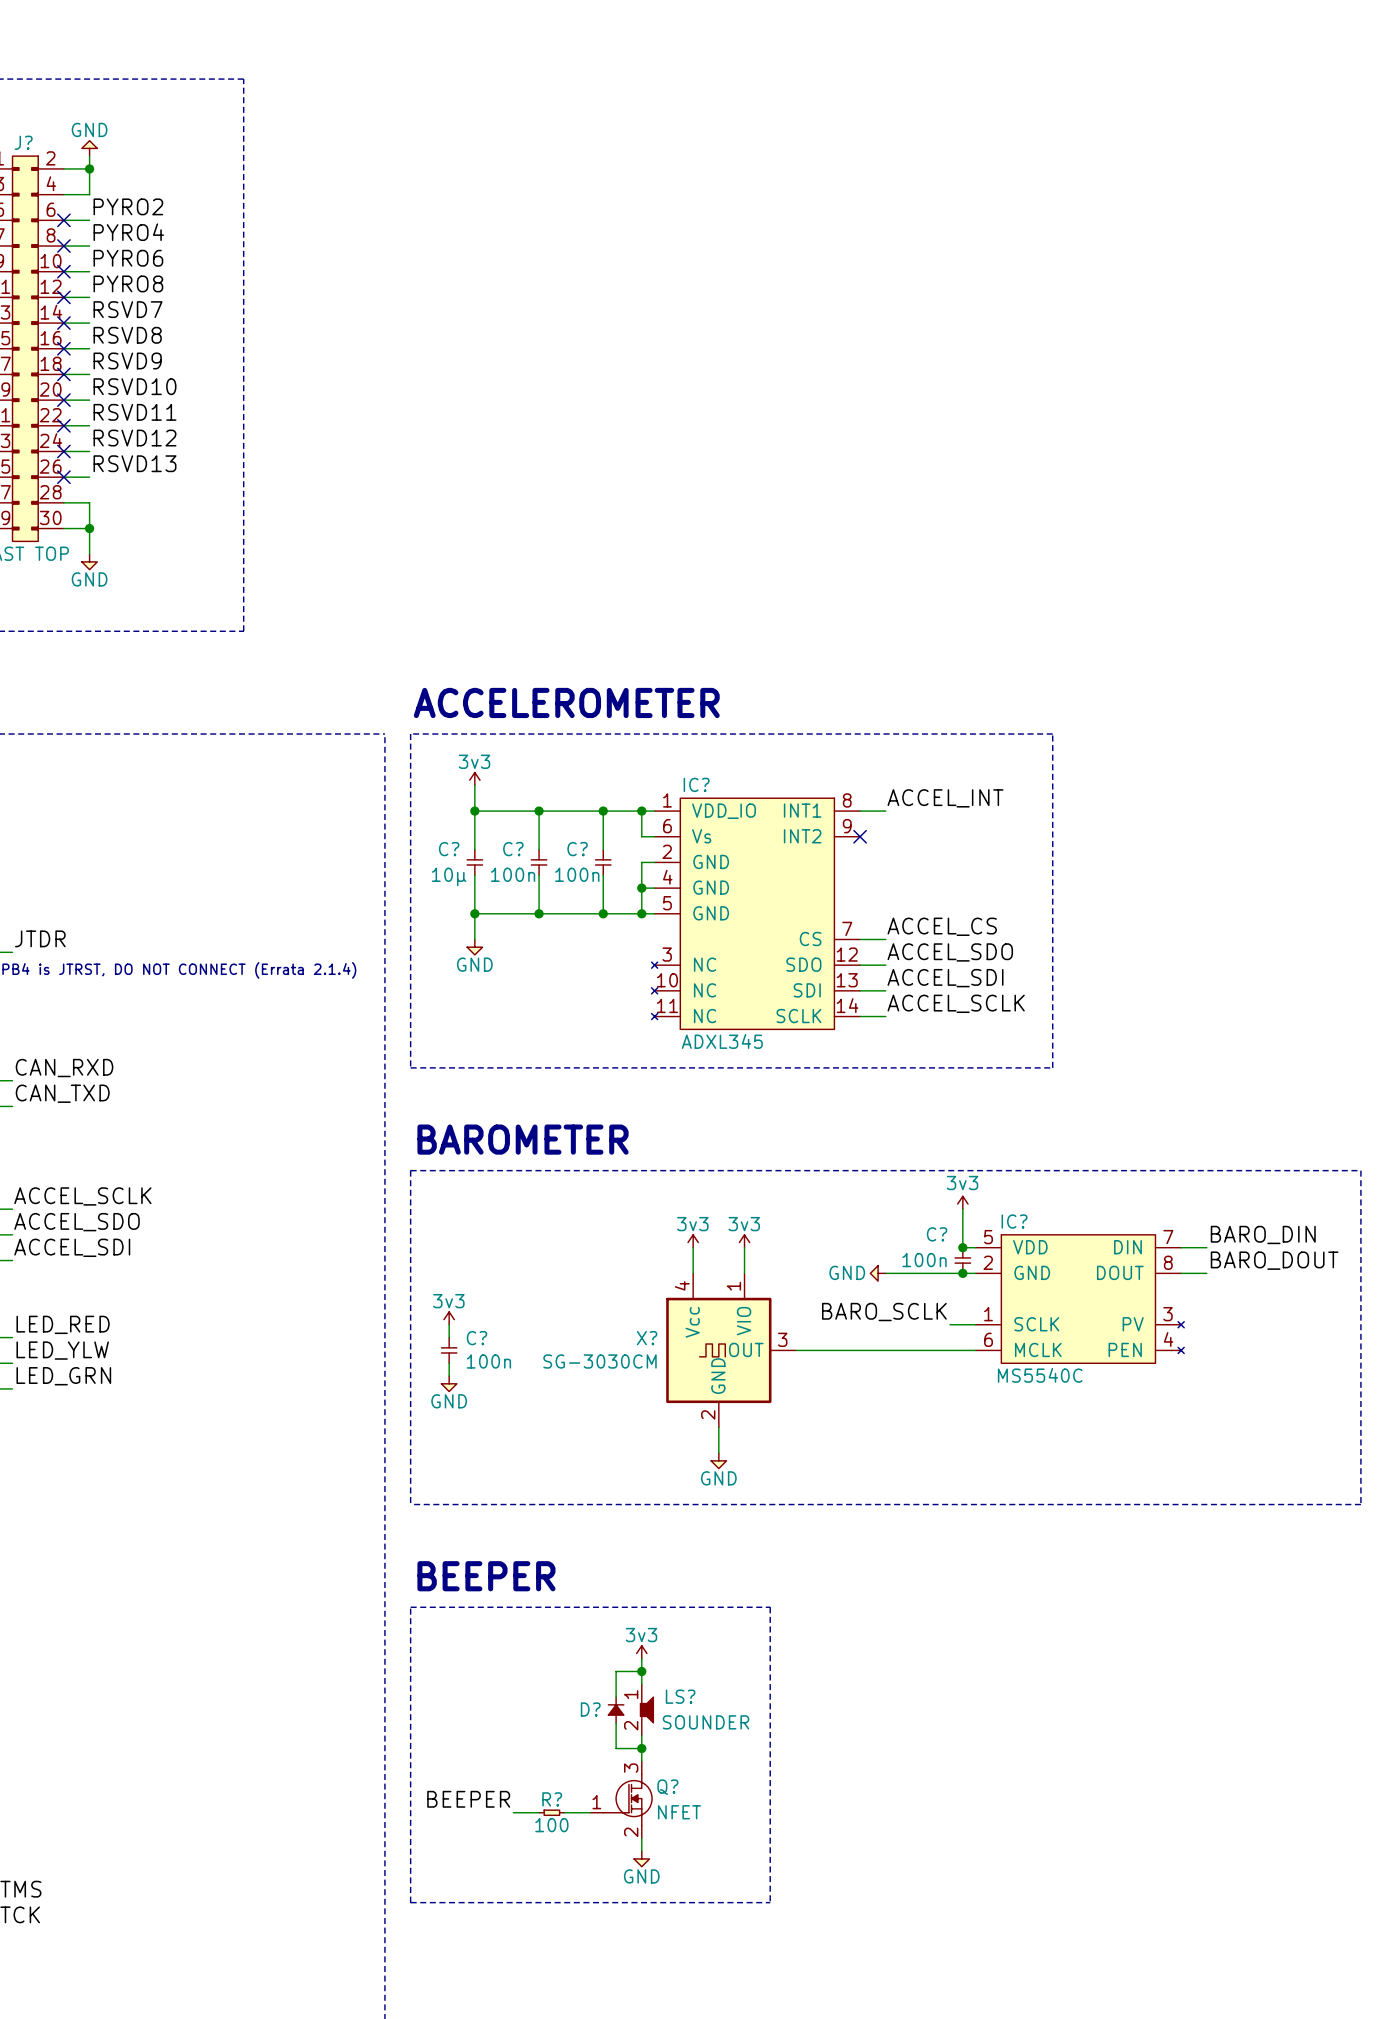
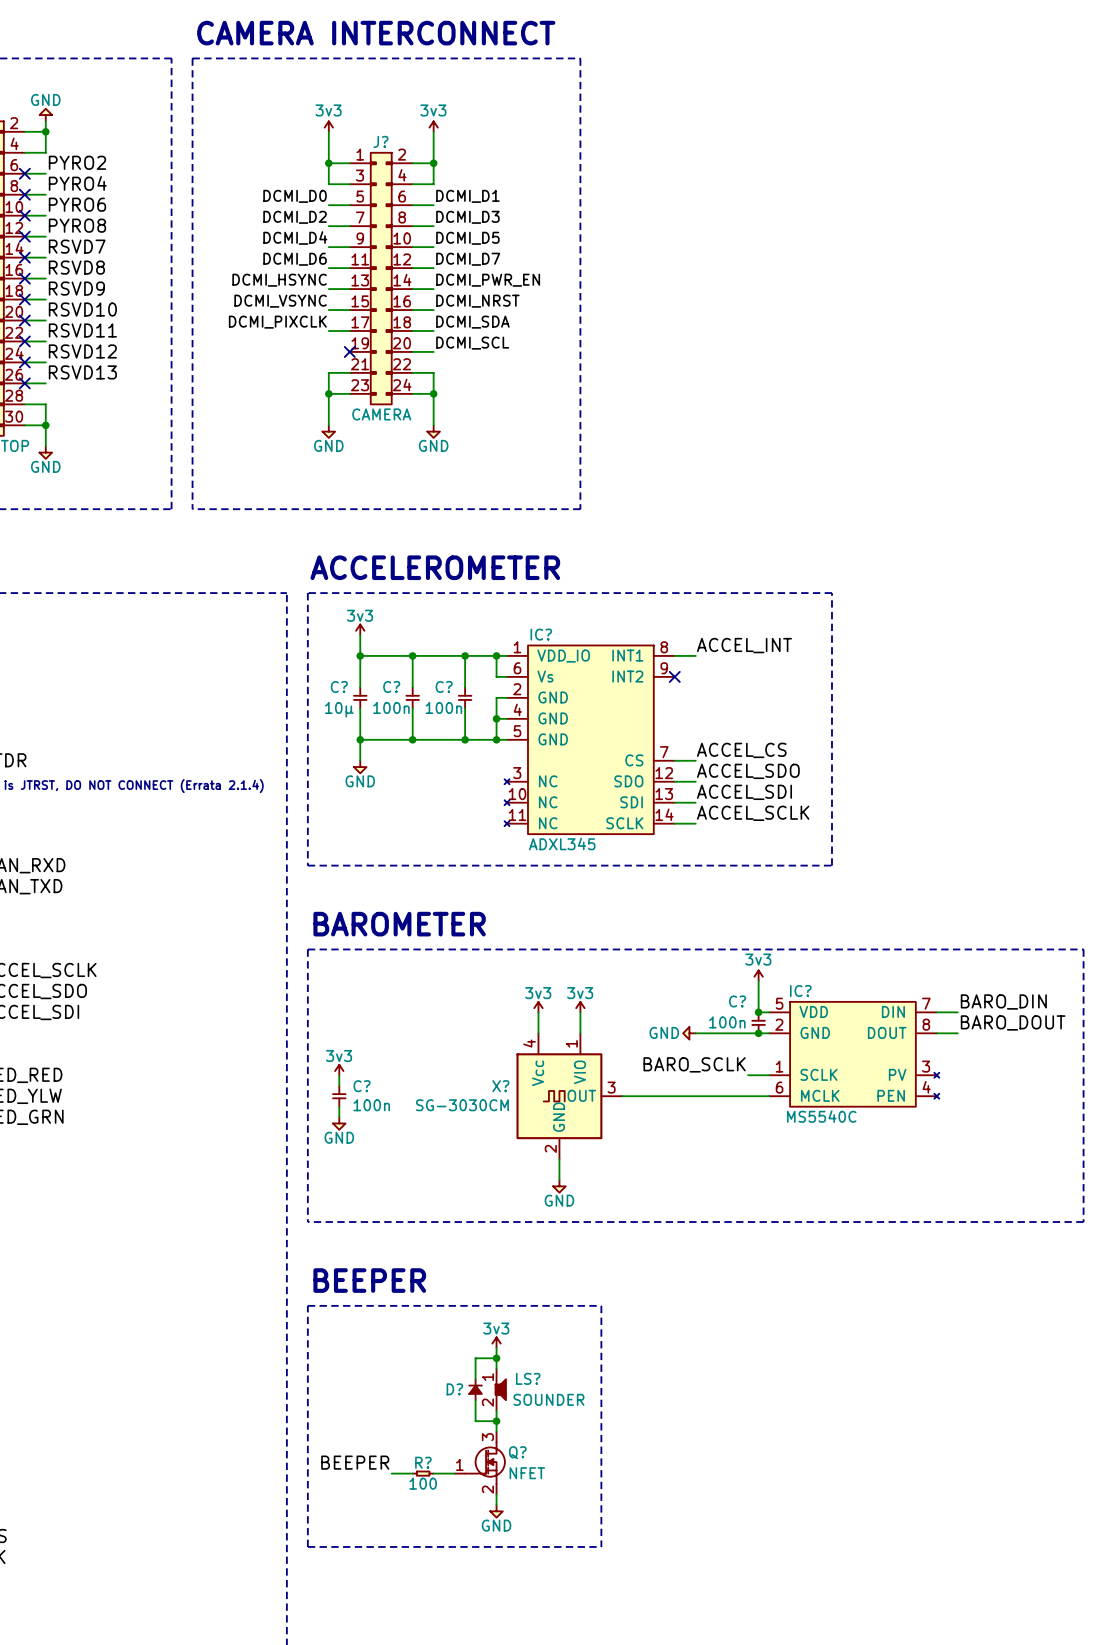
text: none -> CAMERA INTERCONNECT (376, 33)
line: none -> (192, 58) (580, 58) (580, 509) (192, 509) (192, 58)
power symbol: none -> 3v3 (328, 126)
power symbol: none -> 3v3 (433, 126)
wire: none -> (328, 131) (328, 184) (349, 184)
wire: none -> (433, 131) (433, 184) (412, 184)
wire: none -> (328, 163) (349, 163)
junction: none -> (328, 163)
wire: none -> (412, 163) (433, 163)
junction: none -> (433, 163)
label: none -> DCMI_D0 (295, 196)
label: none -> DCMI_D1 (467, 196)
wire: none -> (328, 205) (349, 205)
wire: none -> (412, 205) (433, 205)
label: none -> DCMI_D2 (295, 217)
label: none -> DCMI_D3 (467, 217)
wire: none -> (328, 226) (349, 226)
wire: none -> (412, 226) (433, 226)
label: none -> DCMI_D4 (295, 238)
label: none -> DCMI_D5 (467, 238)
wire: none -> (328, 247) (349, 247)
wire: none -> (412, 247) (433, 247)
label: none -> DCMI_D6 (295, 259)
label: none -> DCMI_D7 (468, 259)
wire: none -> (328, 268) (349, 268)
wire: none -> (412, 268) (433, 268)
J?: none -> CAMERA (381, 278)
label: none -> DCMI_HSYNC (279, 280)
label: none -> DCMI_PWR_EN (488, 280)
wire: none -> (328, 289) (349, 289)
wire: none -> (412, 289) (433, 289)
label: none -> DCMI_VSYNC (280, 301)
label: none -> DCMI_NRST (477, 301)
wire: none -> (328, 310) (349, 310)
wire: none -> (412, 310) (433, 310)
label: none -> DCMI_PIXCLK (277, 322)
label: none -> DCMI_SDA (472, 322)
wire: none -> (328, 330) (349, 330)
wire: none -> (412, 330) (433, 330)
label: none -> DCMI_SCL (472, 343)
no-connect mark: none -> (349, 351)
wire: none -> (412, 351) (433, 351)
wire: none -> (349, 372) (328, 372) (328, 425)
wire: none -> (412, 372) (433, 372) (433, 425)
wire: none -> (328, 393) (349, 393)
junction: none -> (328, 393)
wire: none -> (412, 393) (433, 393)
junction: none -> (433, 393)
power symbol: none -> GND (328, 431)
power symbol: none -> GND (433, 431)

